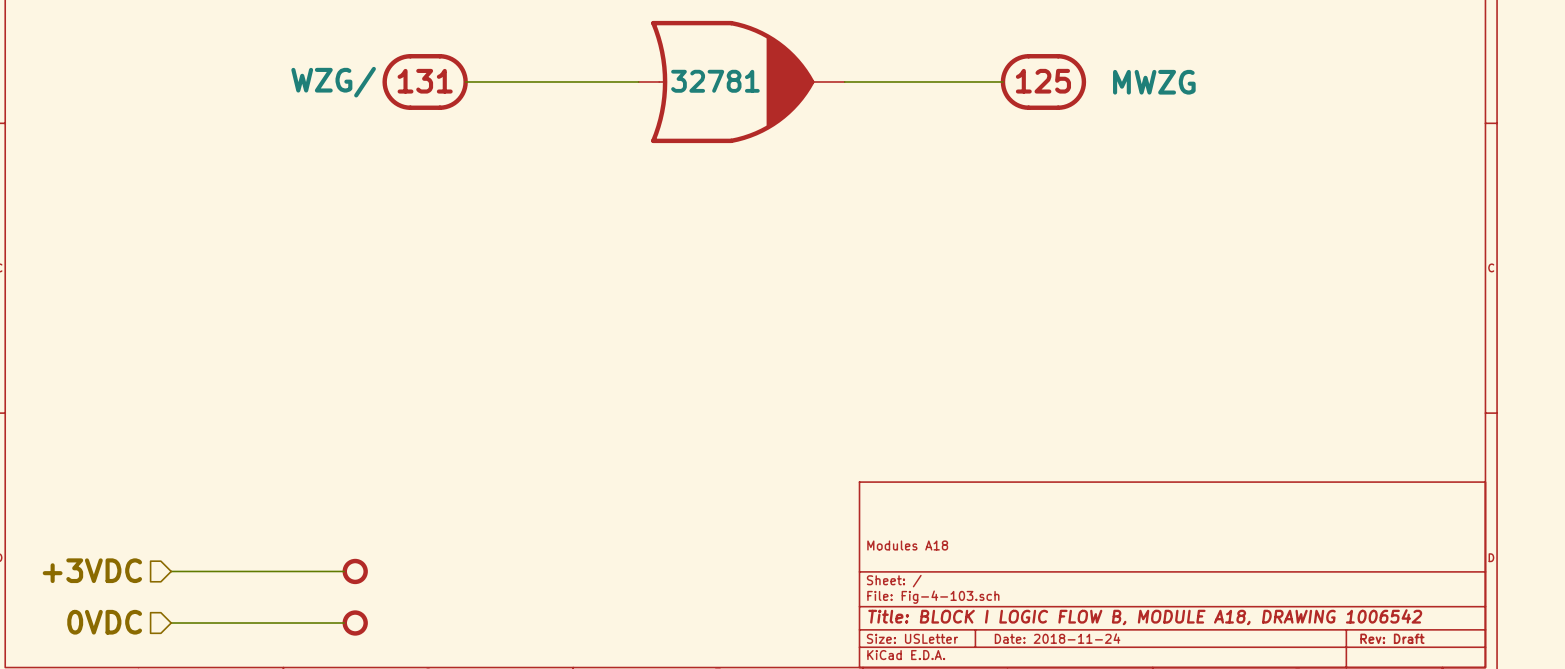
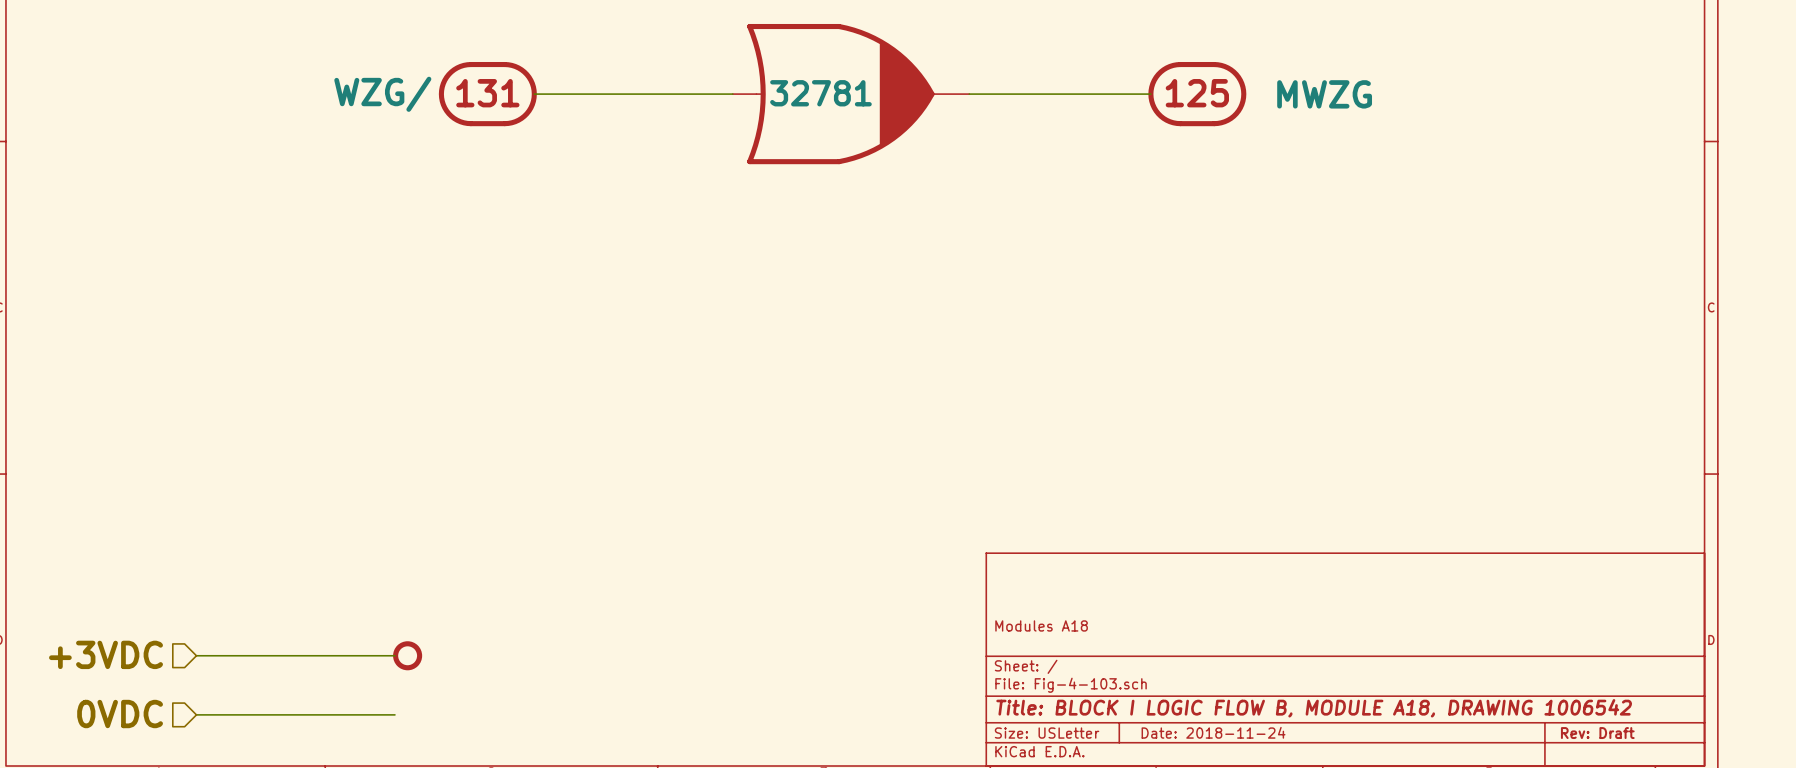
part: (355, 623) -> none

